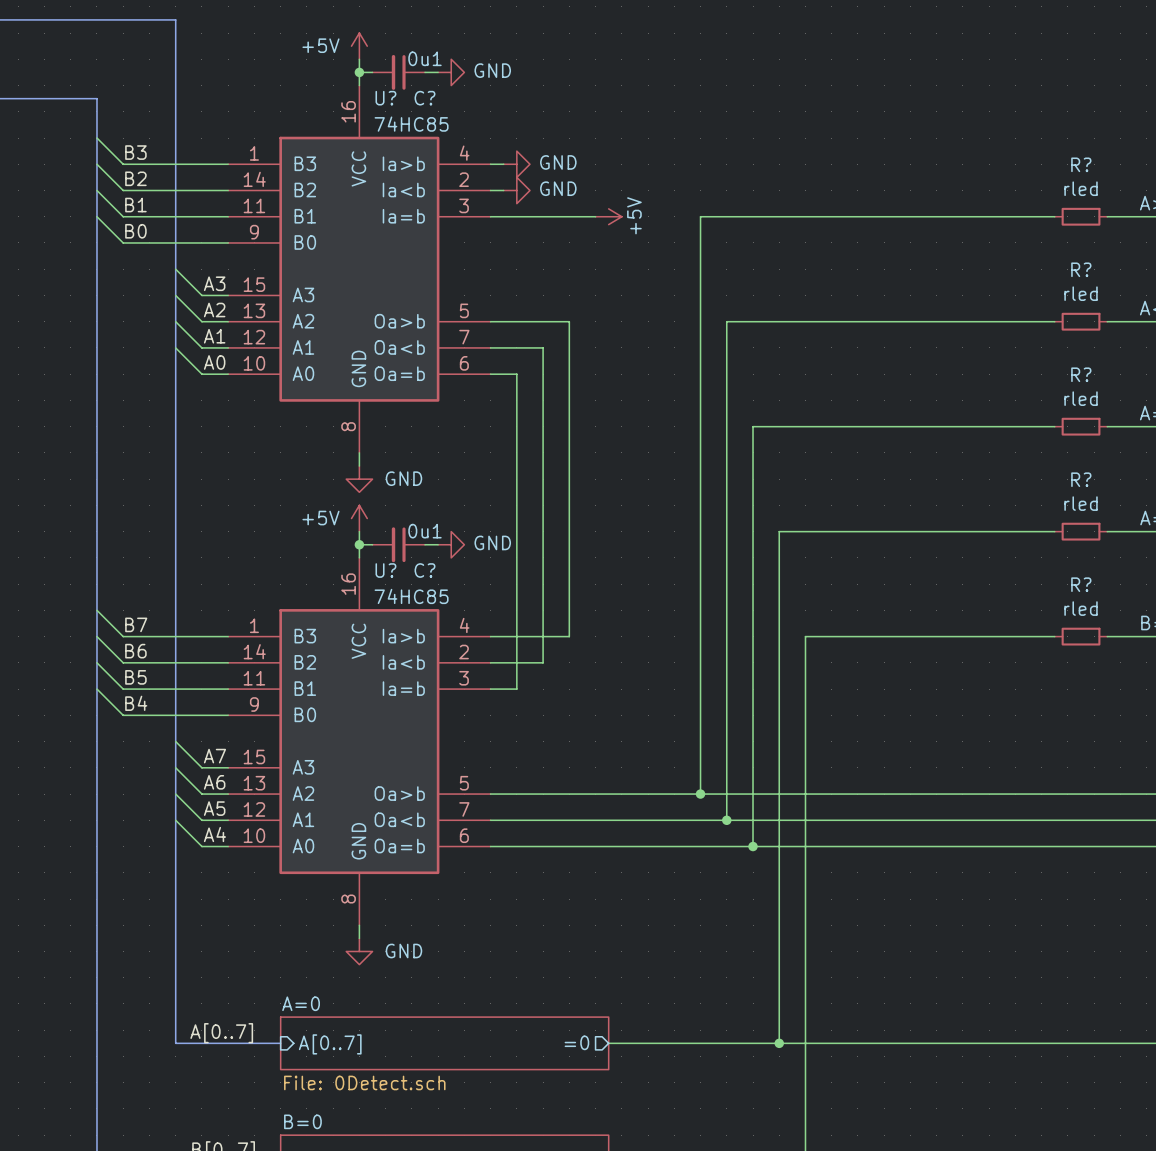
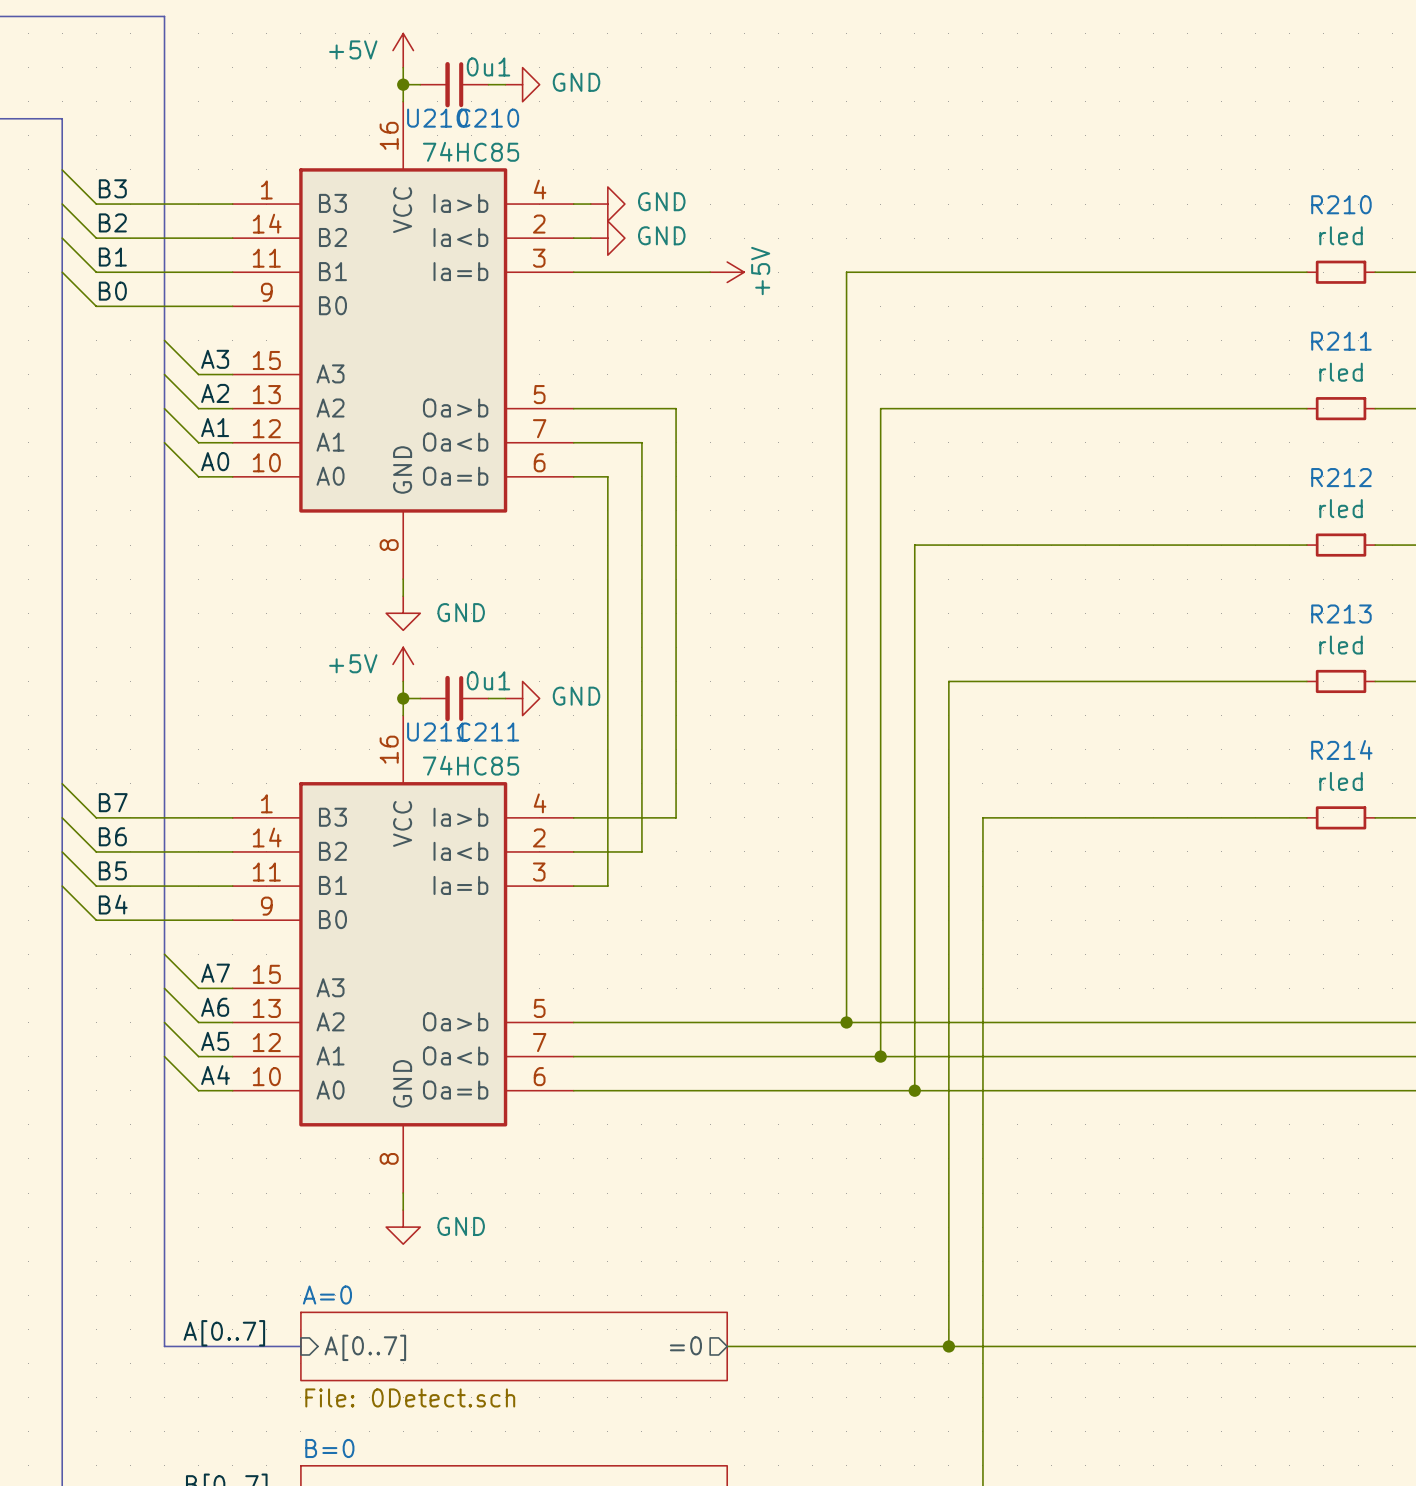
U? name: U? (385, 98) -> U210 (437, 118)
C? name: C? (424, 98) -> C210 (488, 118)
R? name: R? (1081, 164) -> R210 (1341, 204)
R? name: R? (1081, 269) -> R211 (1341, 341)
R? name: R? (1081, 374) -> R212 (1341, 477)
R? name: R? (1081, 479) -> R213 (1341, 613)
U? name: U? (385, 570) -> U211 (437, 731)
C? name: C? (424, 570) -> C211 (488, 731)
R? name: R? (1081, 584) -> R214 (1341, 749)

